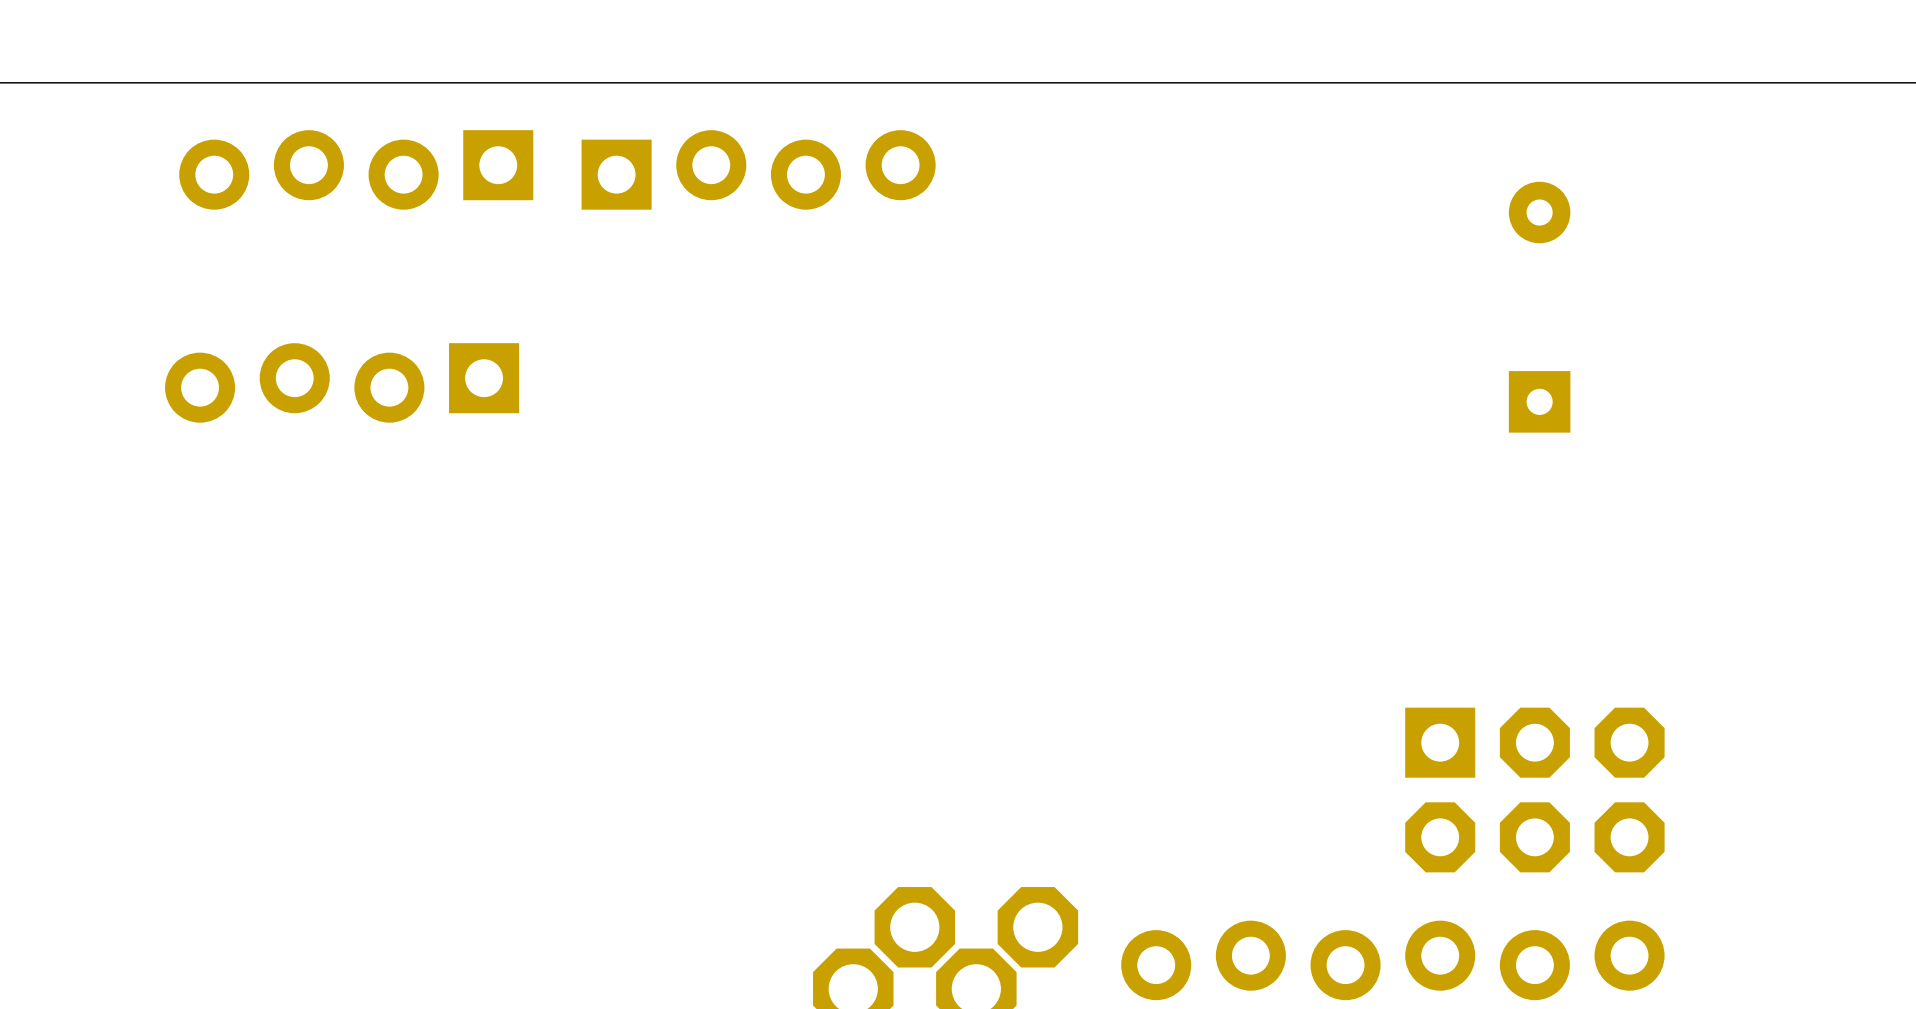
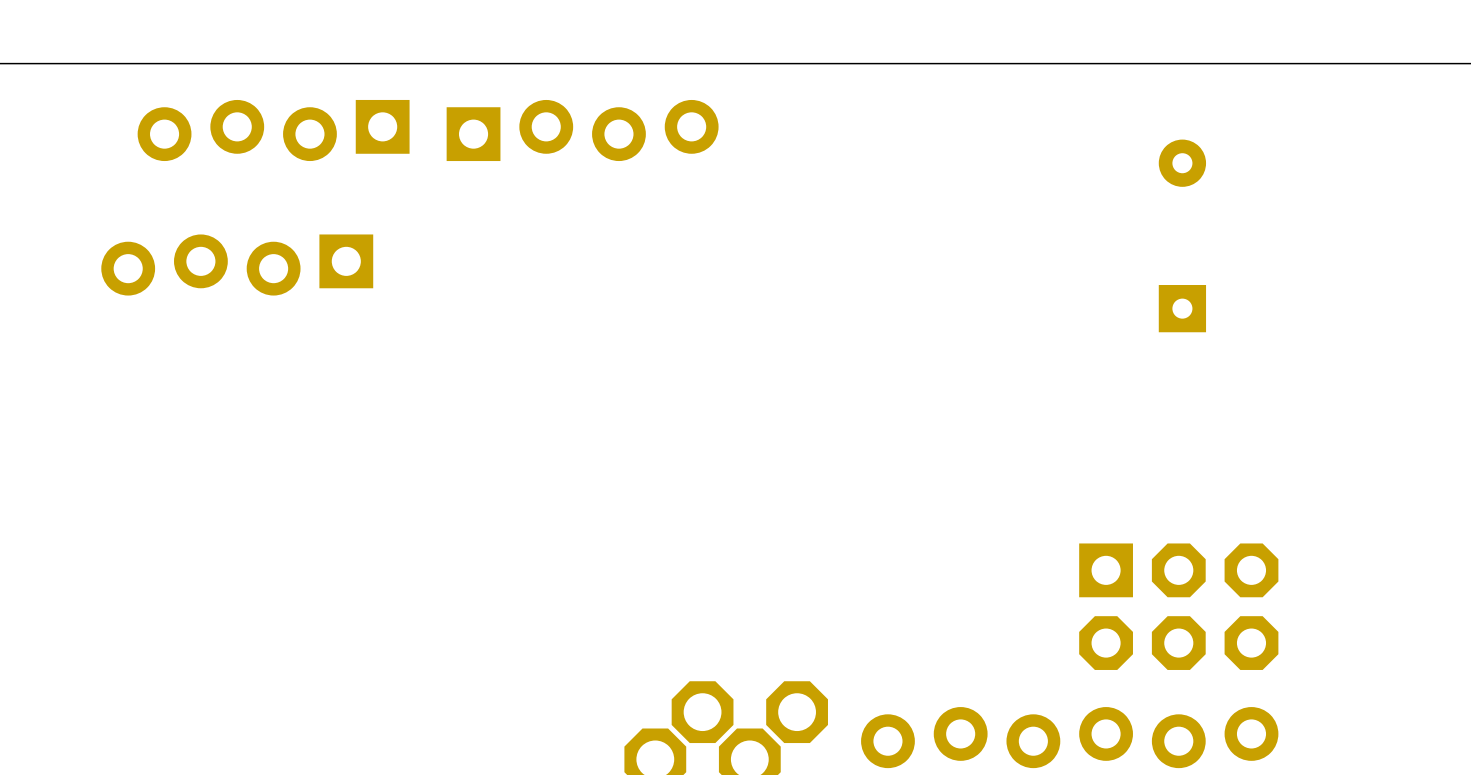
part position: (342, 382) -> (237, 265)

